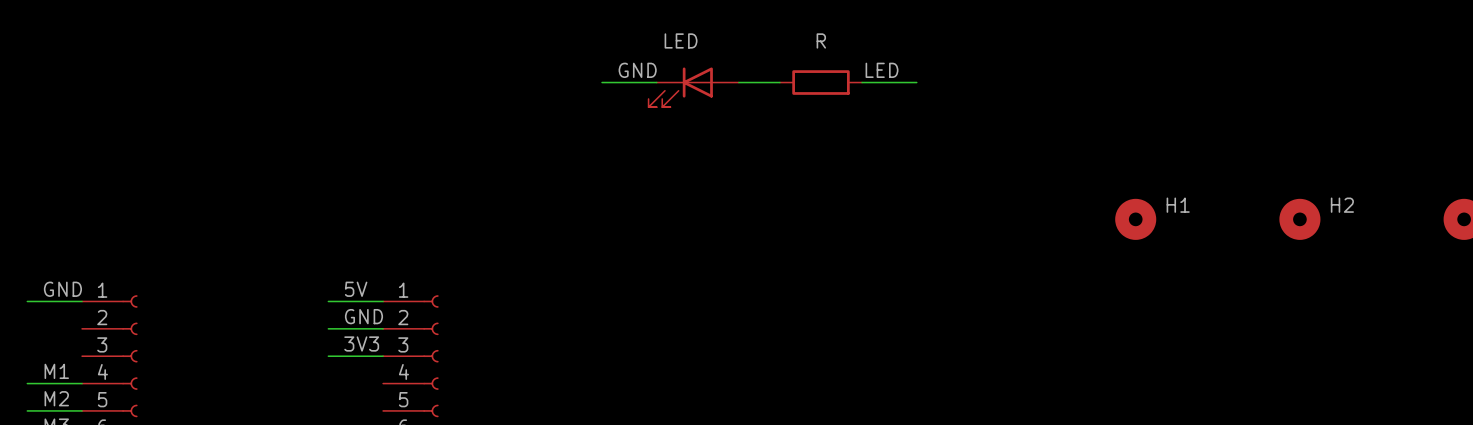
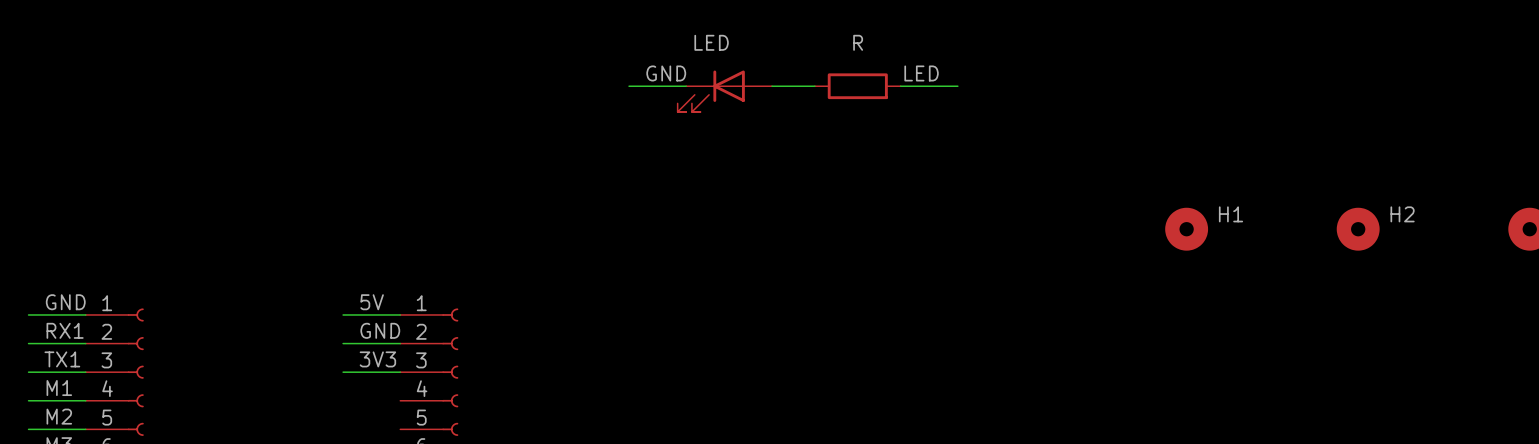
label: none -> RX1 (65, 330)
wire: none -> (28, 343) (85, 343)
label: none -> TX1 (62, 359)
wire: none -> (28, 372) (85, 372)

